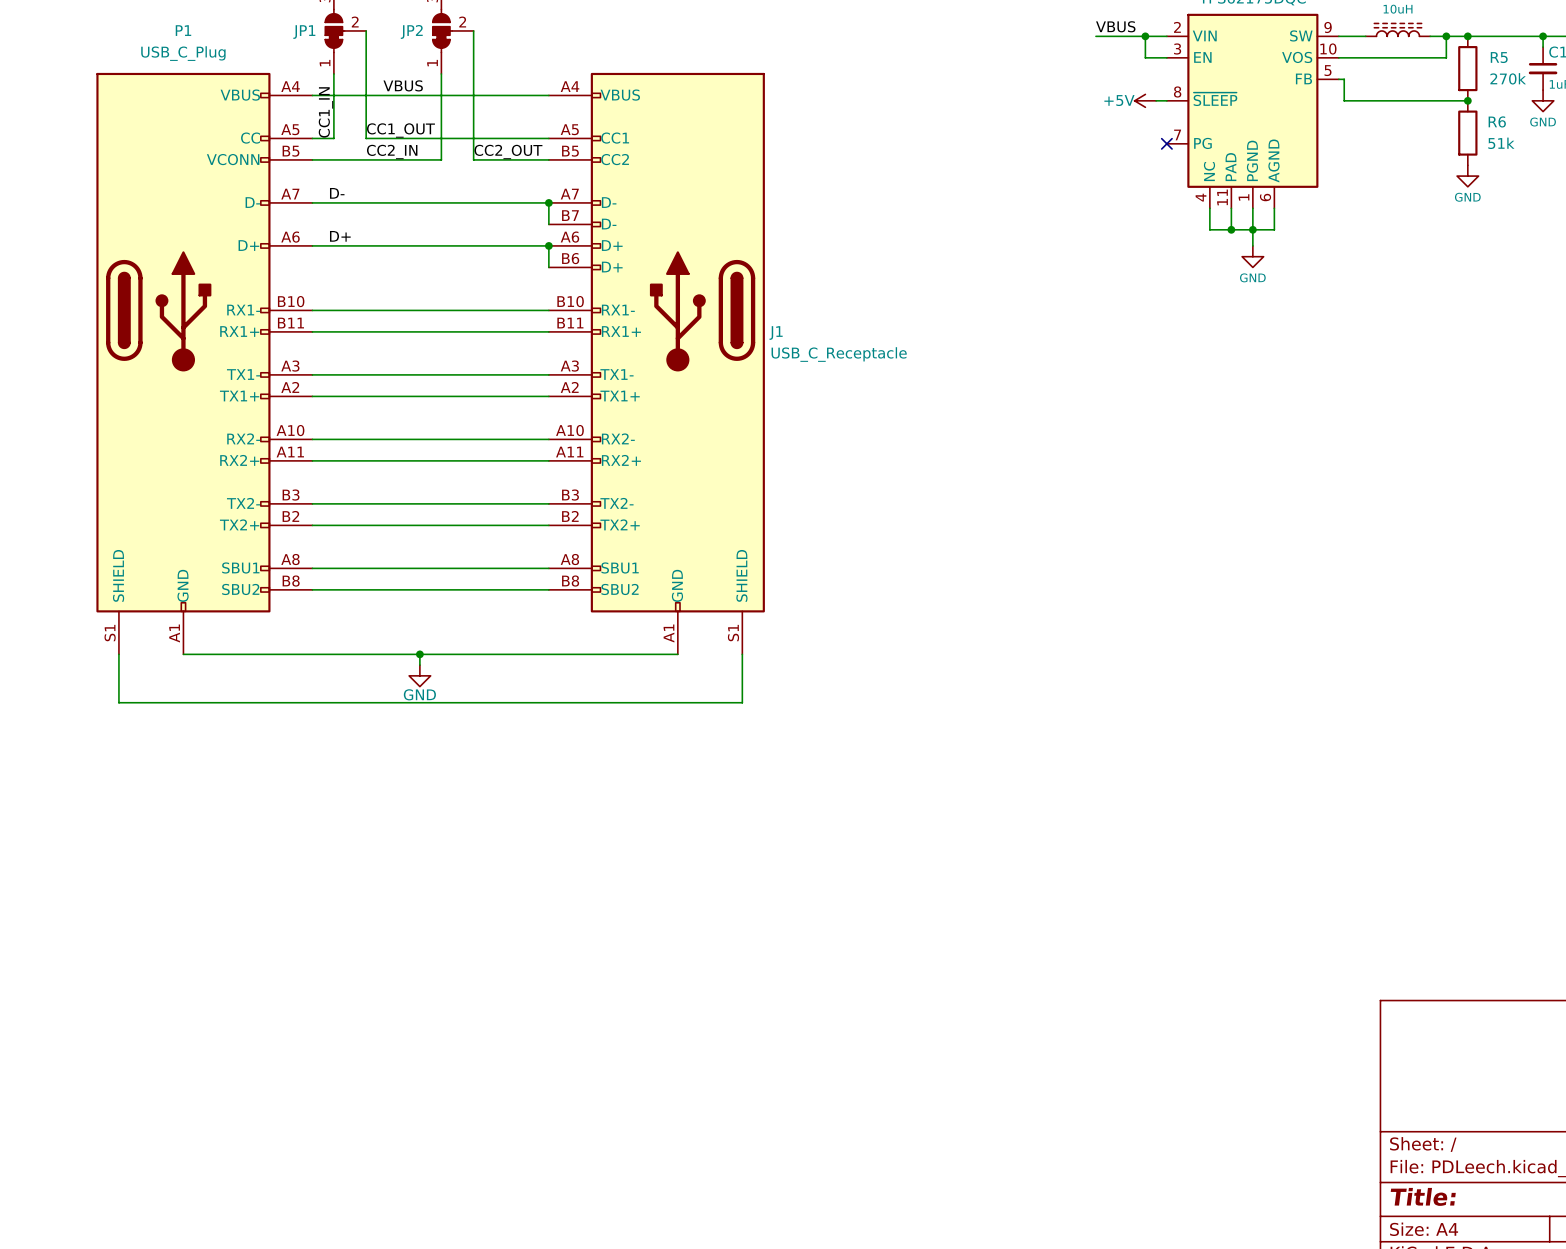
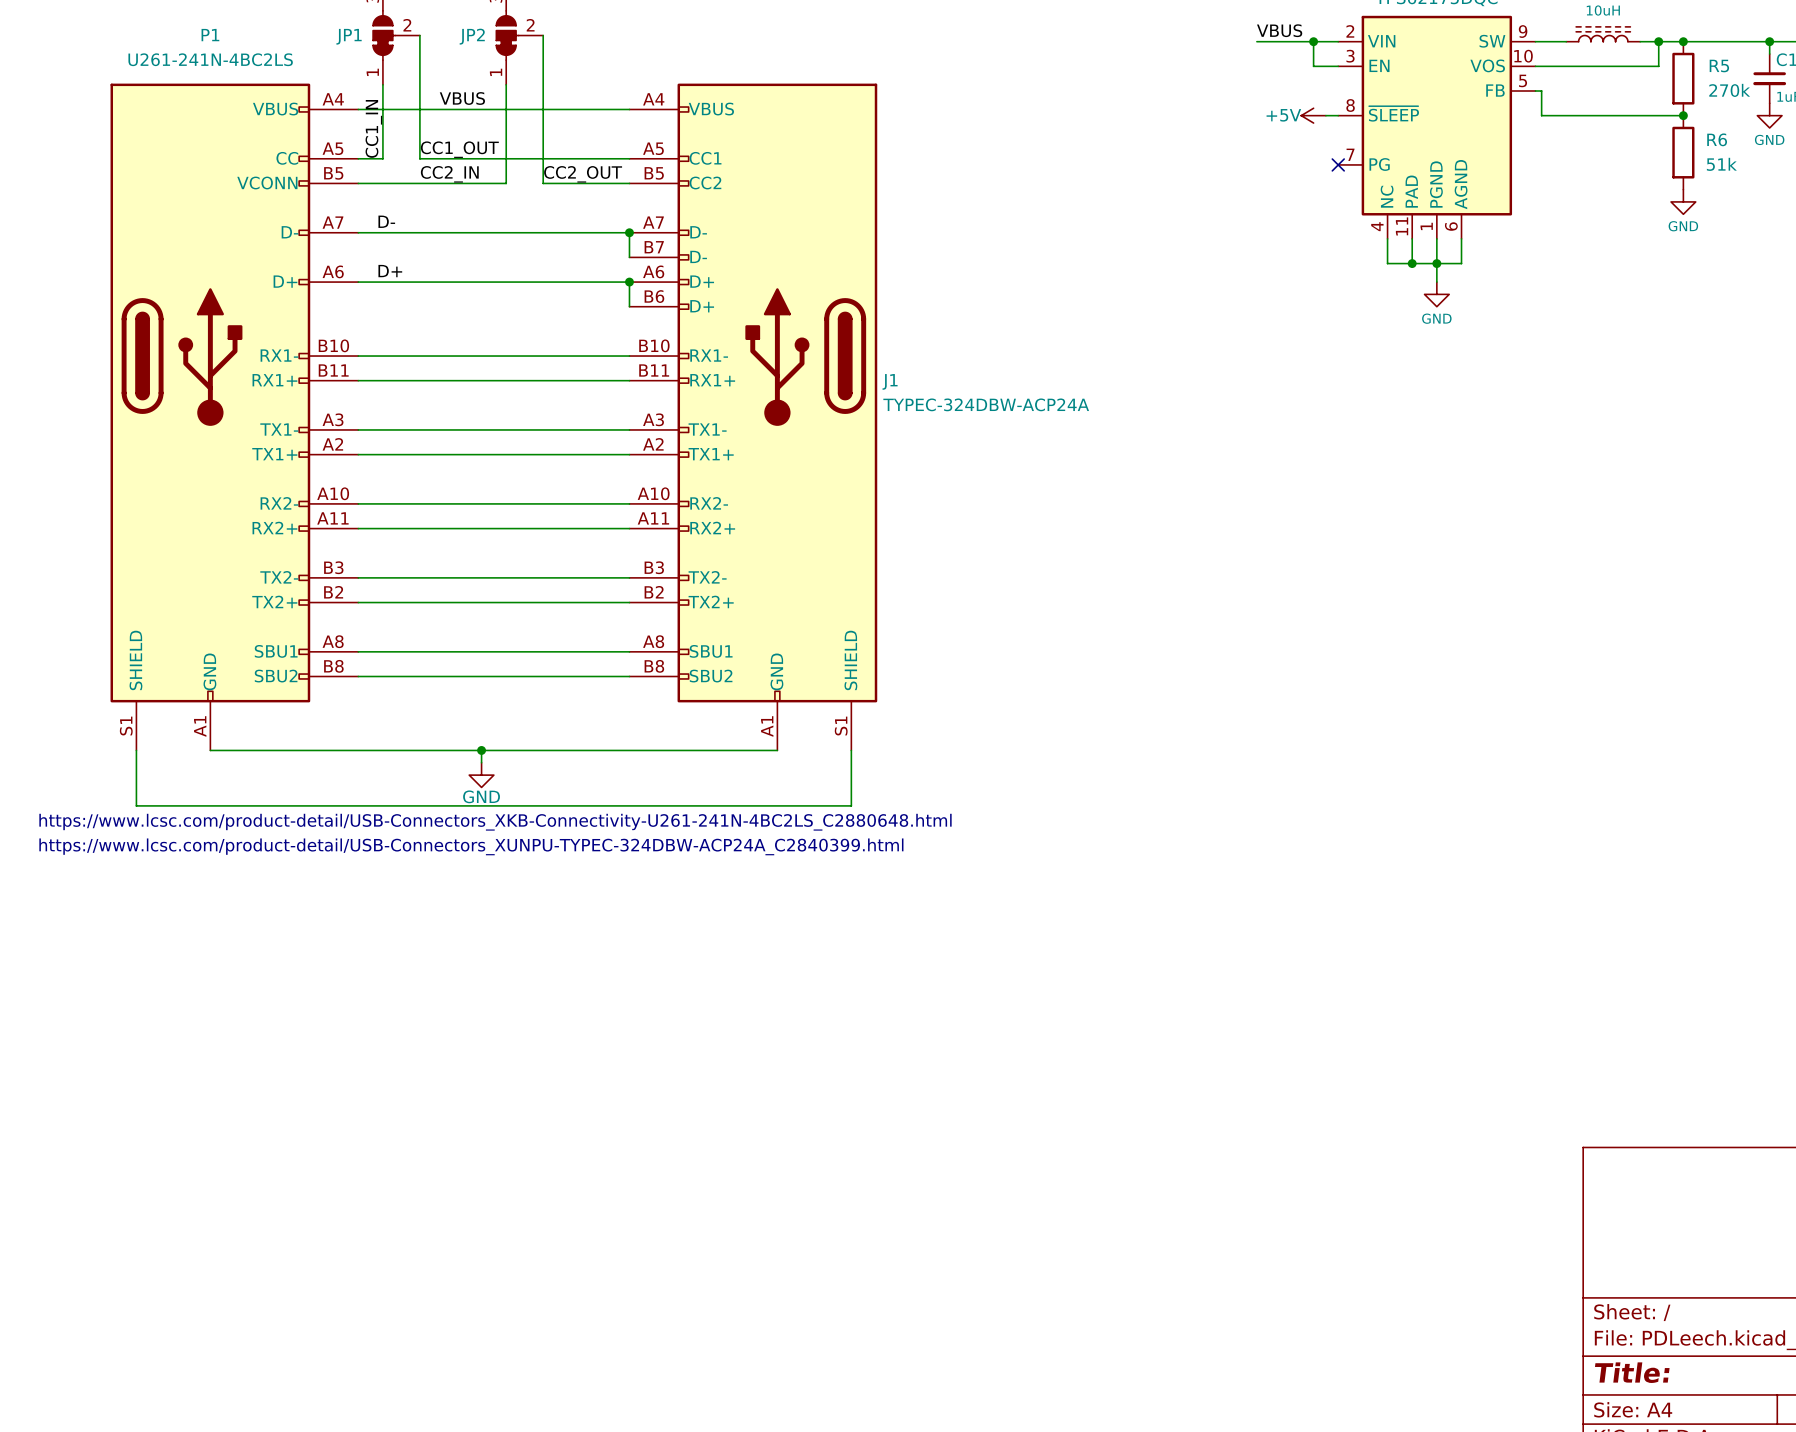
P1 value: USB_C_Plug (183, 53) -> U261-241N-4BC2LS (210, 59)
J1 value: USB_C_Receptacle (839, 354) -> TYPEC-324DBW-ACP24A (986, 404)
text: none -> https://www.lcsc.com/product-detail/USB-Connectors_XKB-Connectivity-U261-241N-4BC2LS_C2880648.html (495, 822)
text: none -> https://www.lcsc.com/product-detail/USB-Connectors_XUNPU-TYPEC-324DBW-ACP24A_C2840399.html (471, 846)

